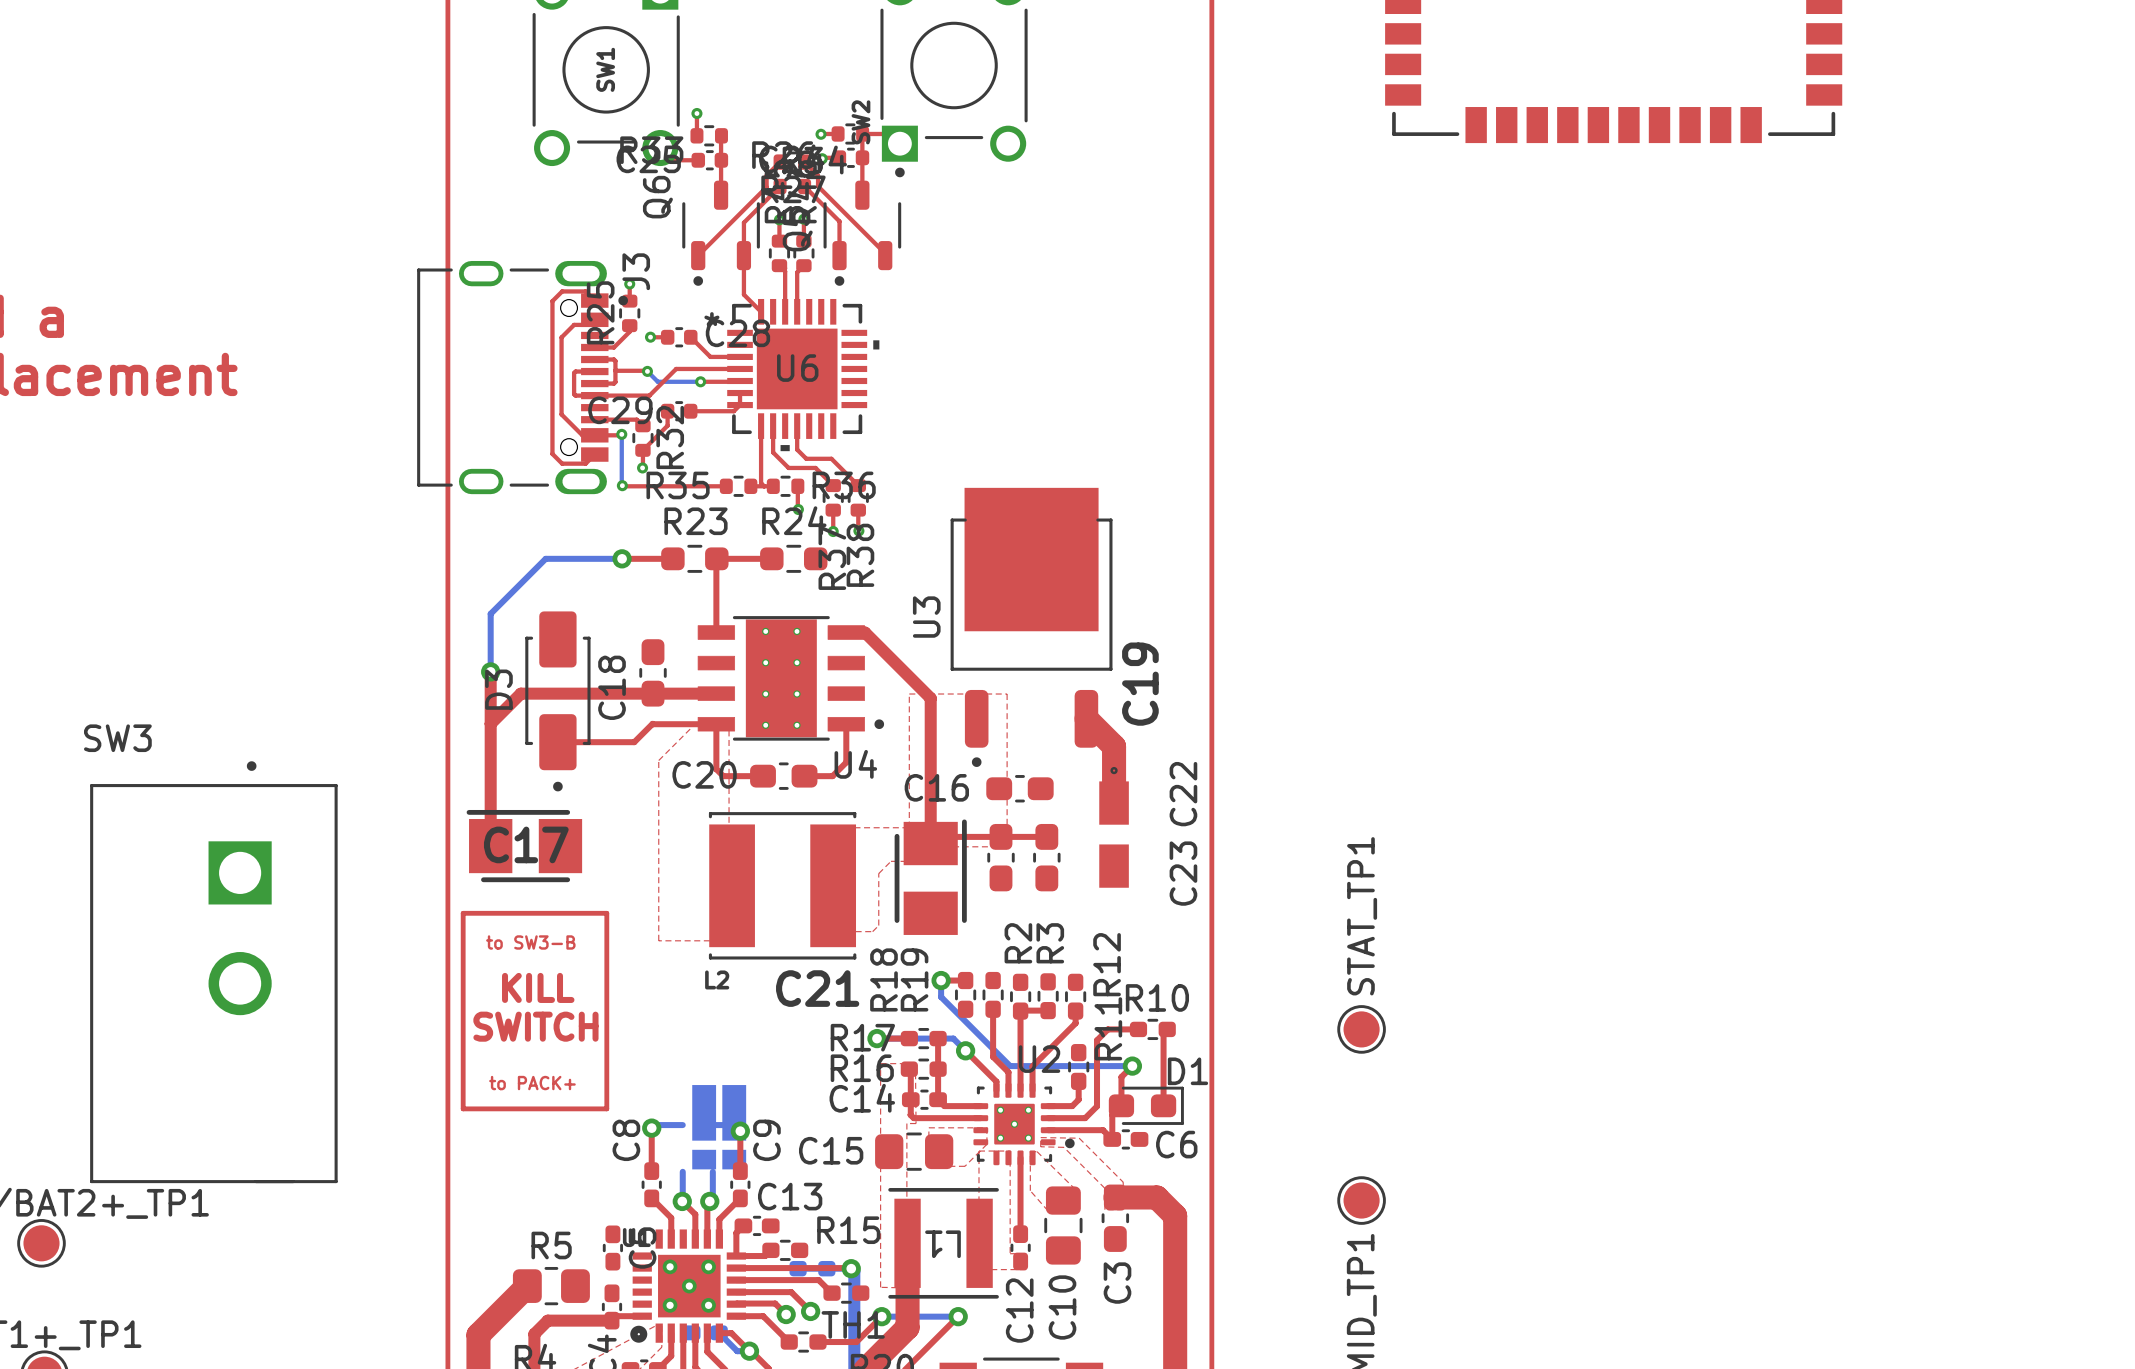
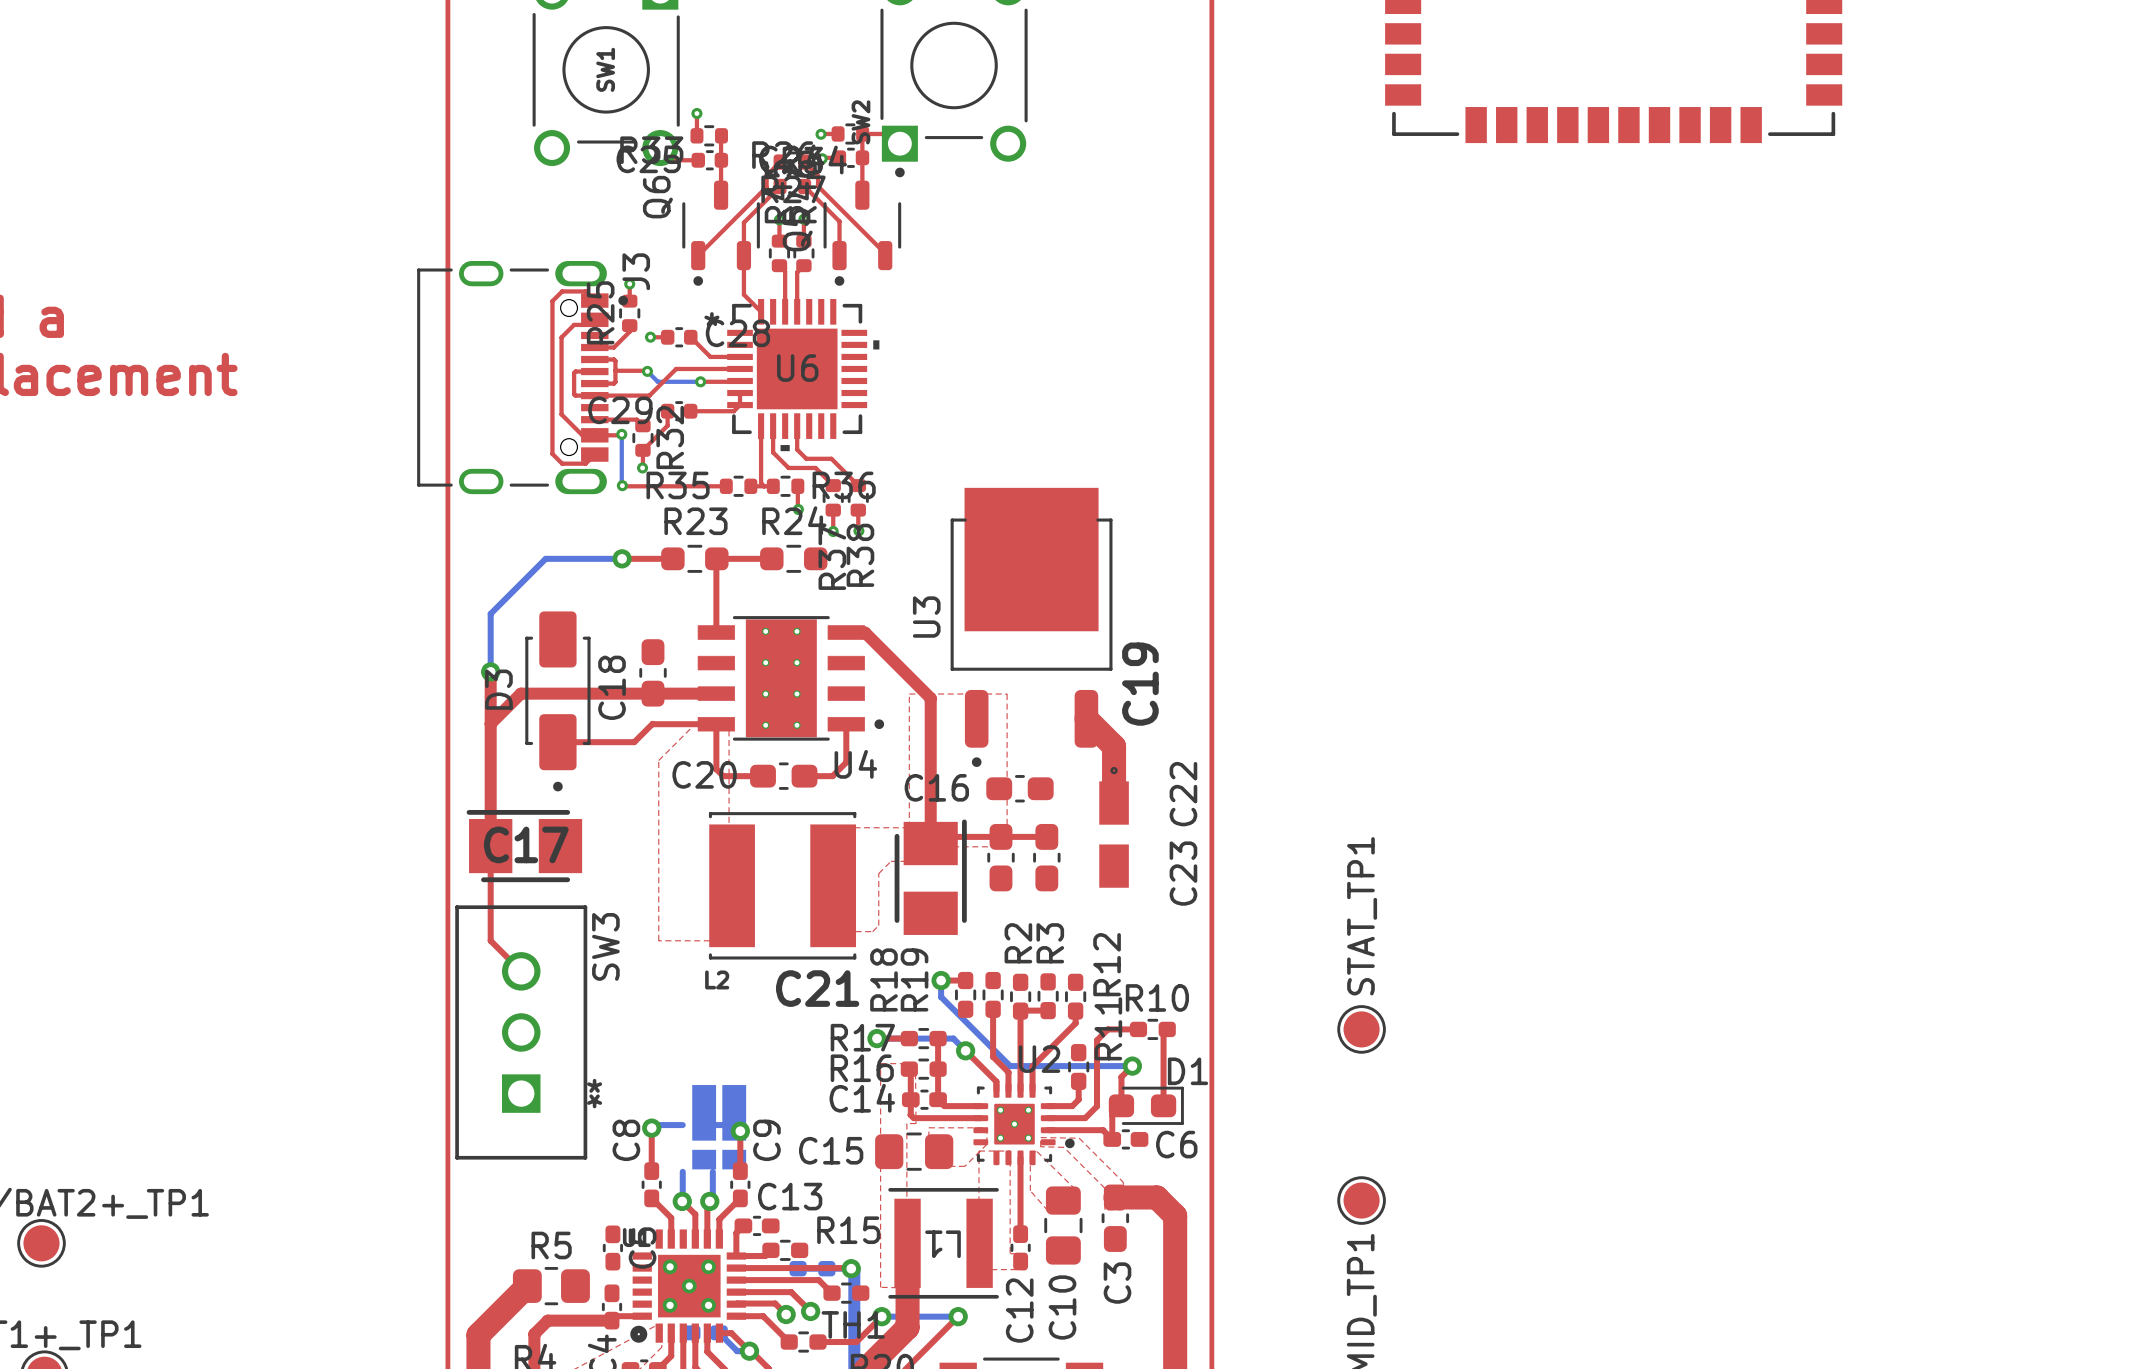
SW3 name position: SW3 (117, 738) -> SW3 (605, 946)
SW3 footprint: [90, 761, 338, 1184] -> [455, 905, 588, 1160]
top track: none -> (490, 846) (490, 940) (521, 971)
top track: (463, 913) (606, 913) (606, 1108) (463, 1108) (463, 913) -> none
text: to SW3-B (530, 942) -> none
text: KILL (538, 987) -> none
text: SWITCH (535, 1026) -> none
text: to PACK+ (532, 1083) -> none

